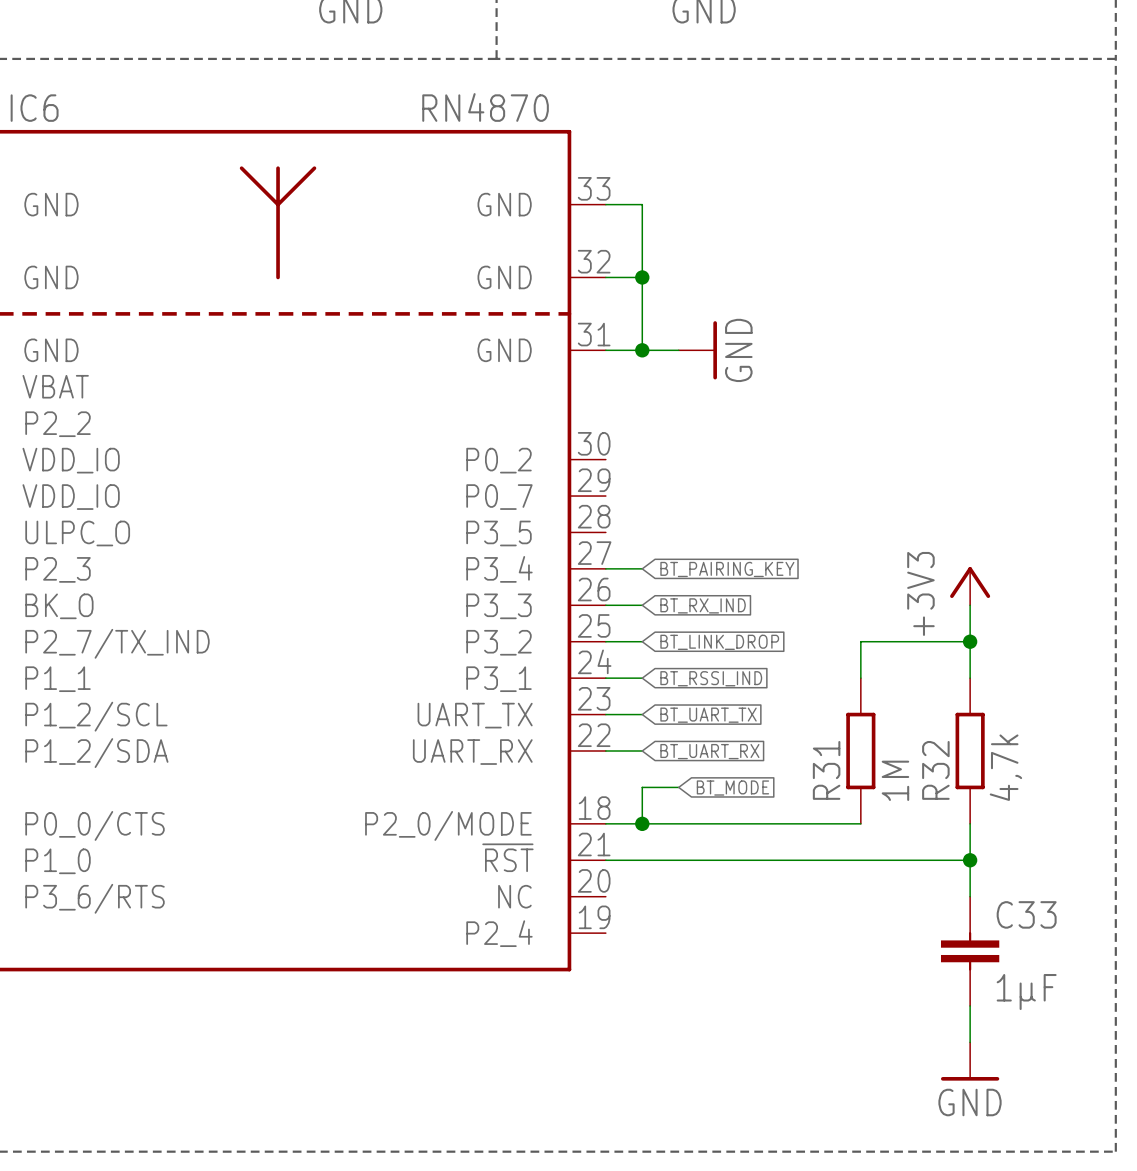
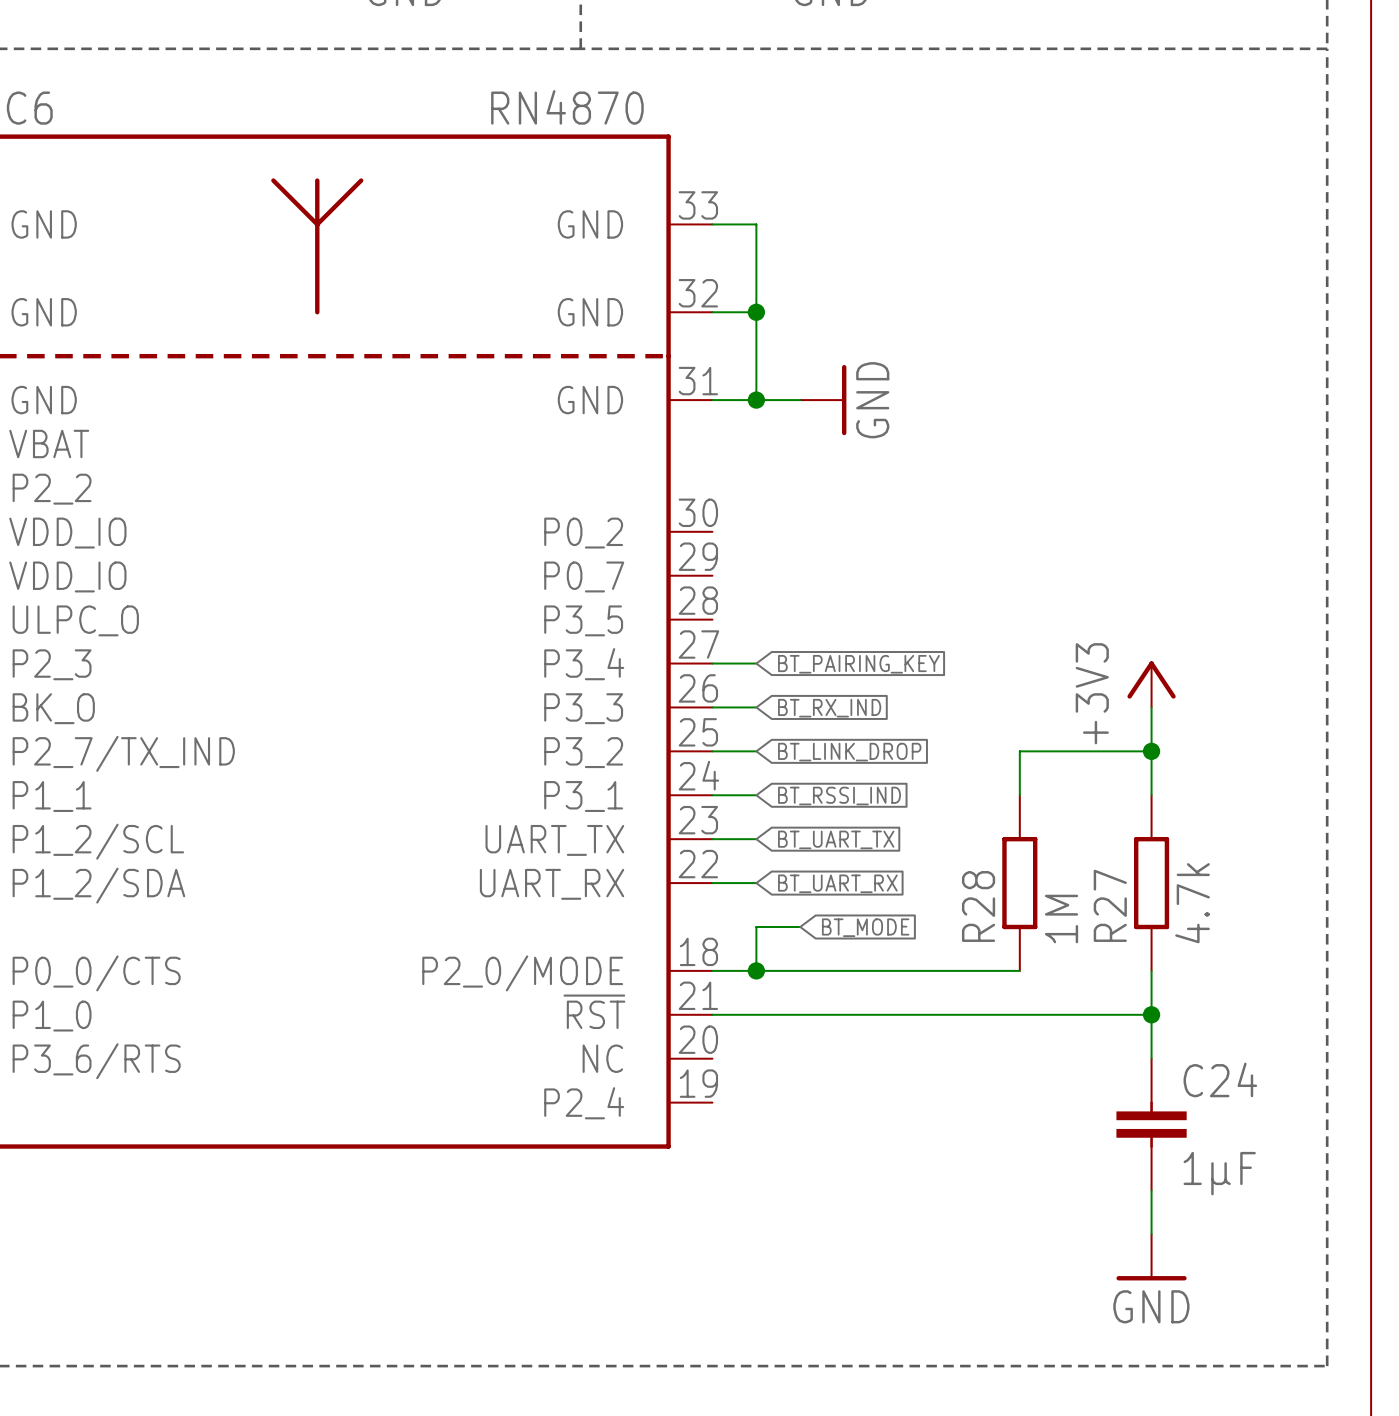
R32 value: 4,7k (1005, 767) -> 4.7k (1192, 903)
R31 name: R31 (826, 770) -> R28 (978, 906)
R32 name: R32 (935, 770) -> R27 (1110, 905)
C33 name: C33 (1026, 914) -> C24 (1220, 1079)

